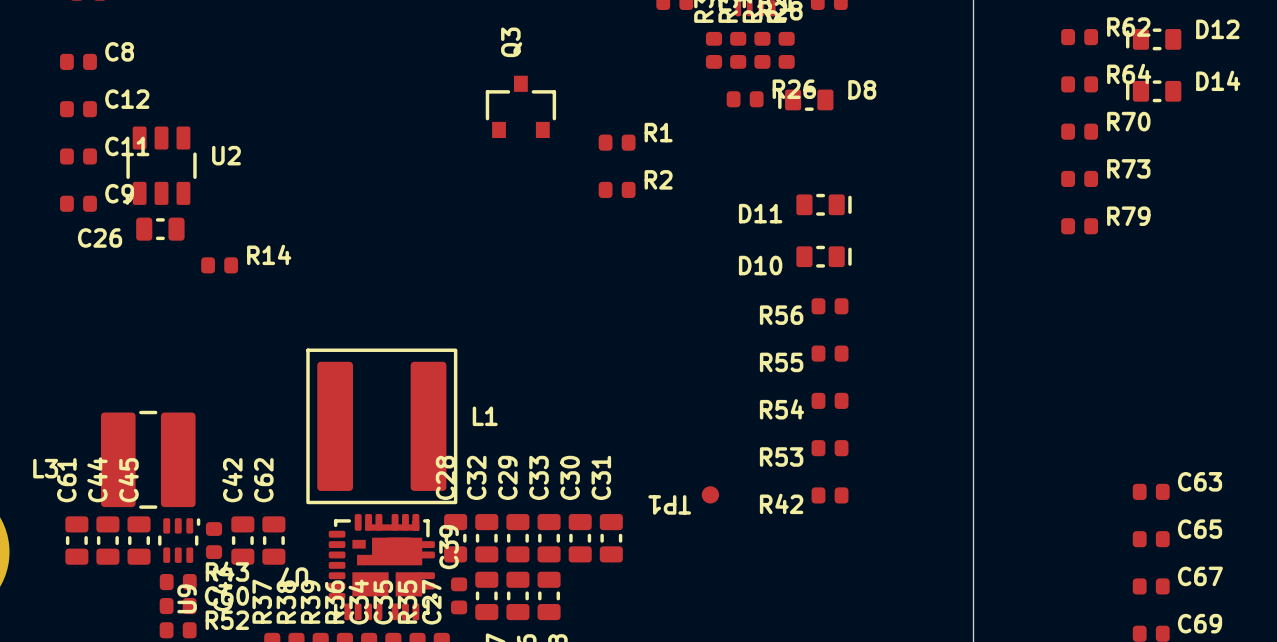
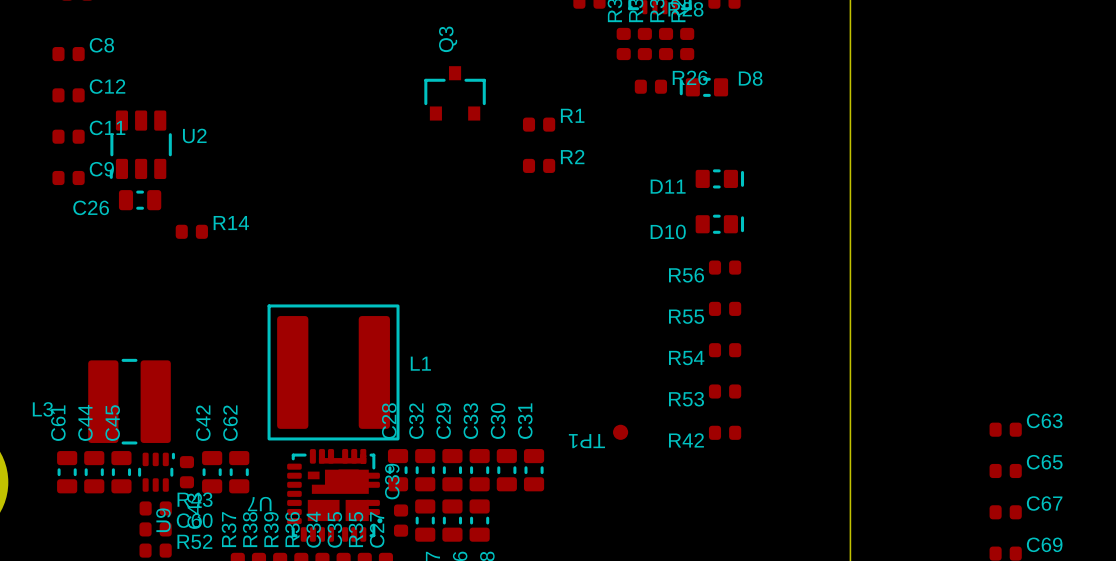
R62: (1079, 37) -> none
D12: (1153, 39) -> none
R64: (1079, 84) -> none
D14: (1153, 91) -> none
R70: (1079, 131) -> none
R73: (1079, 178) -> none
R79: (1079, 226) -> none

